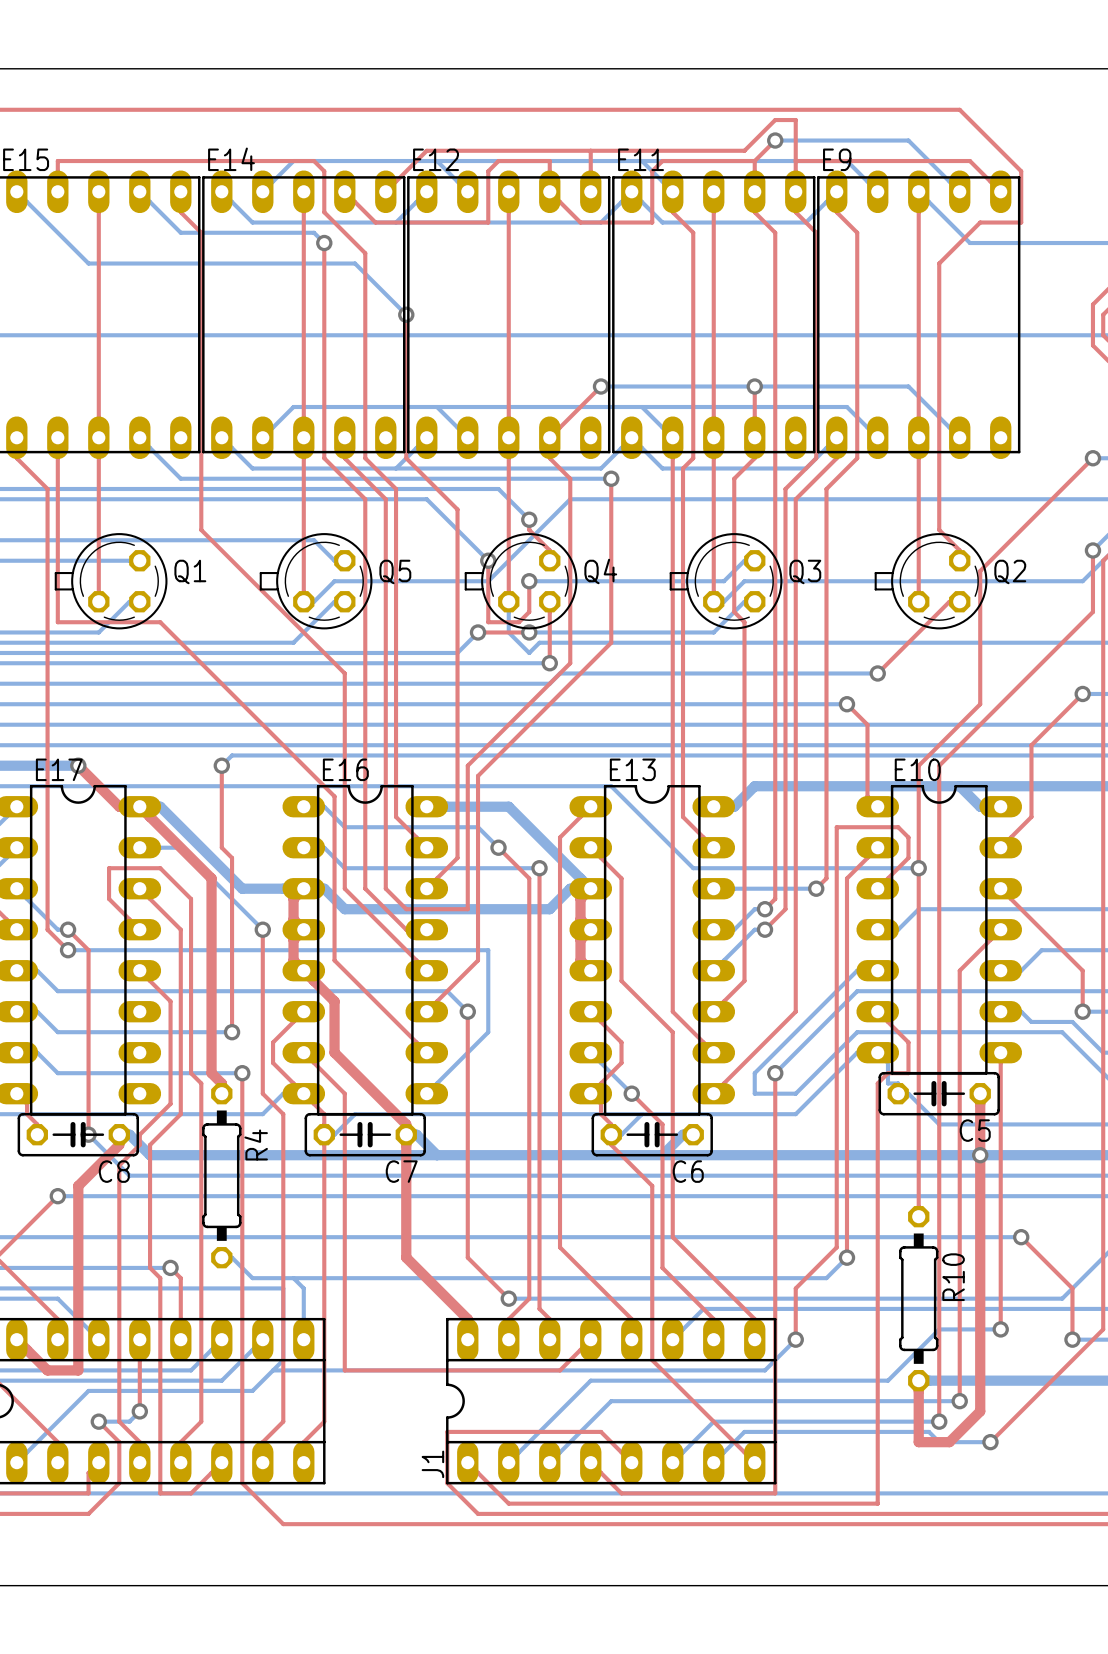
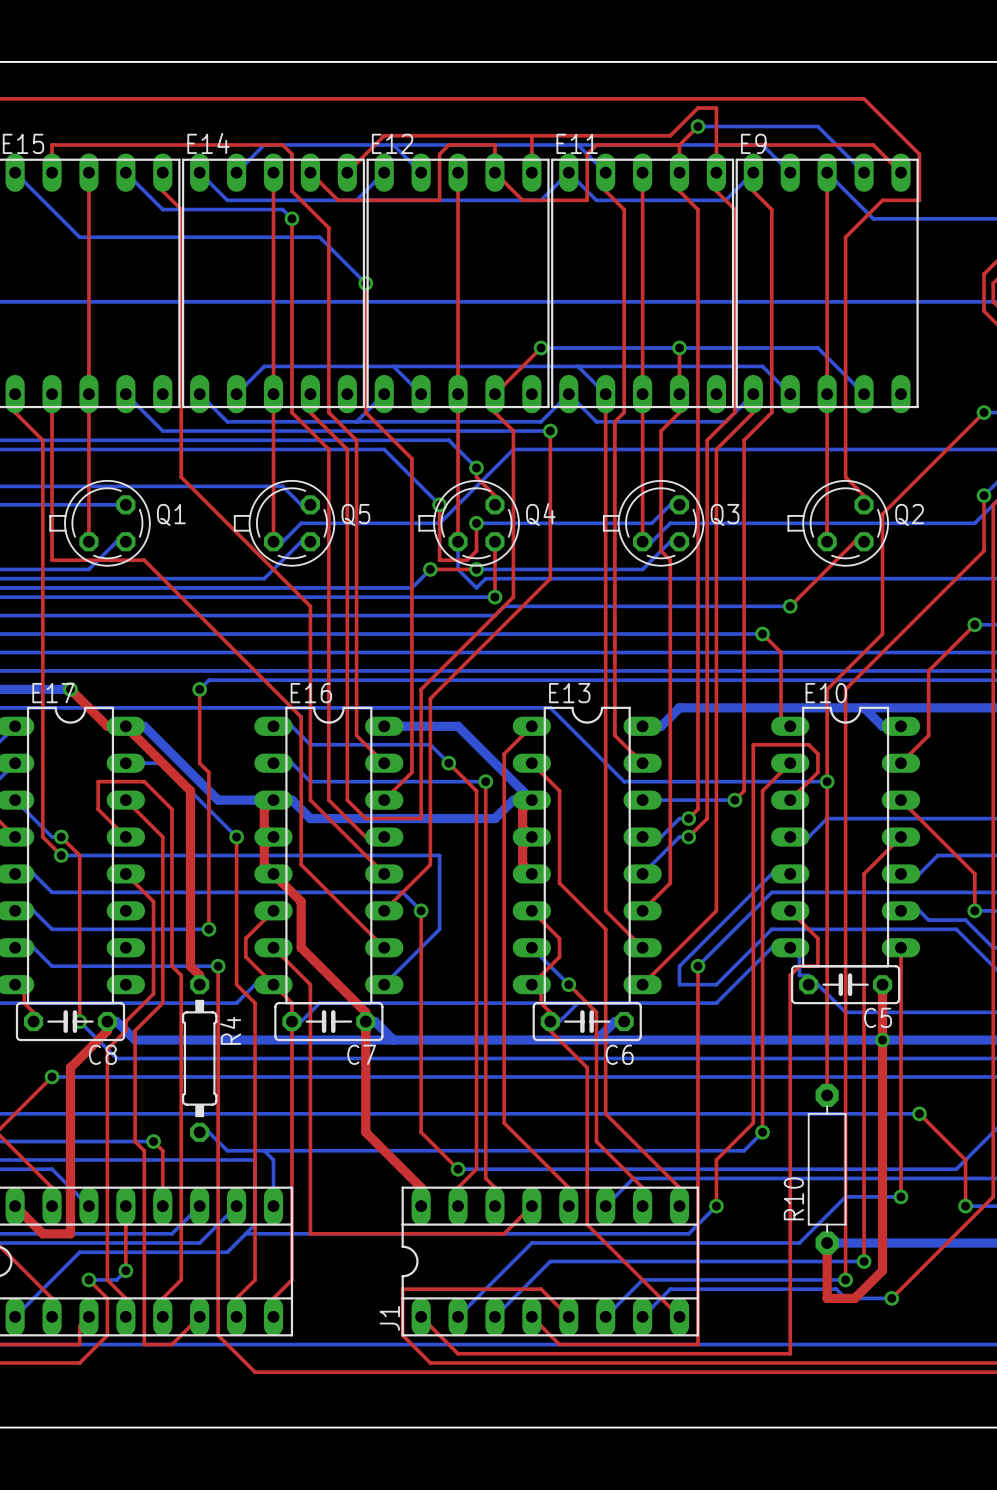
R10 footprint: [899, 1206, 939, 1392] -> [807, 1083, 847, 1255]
R10 name position: R10 (953, 1277) -> R10 (793, 1198)

